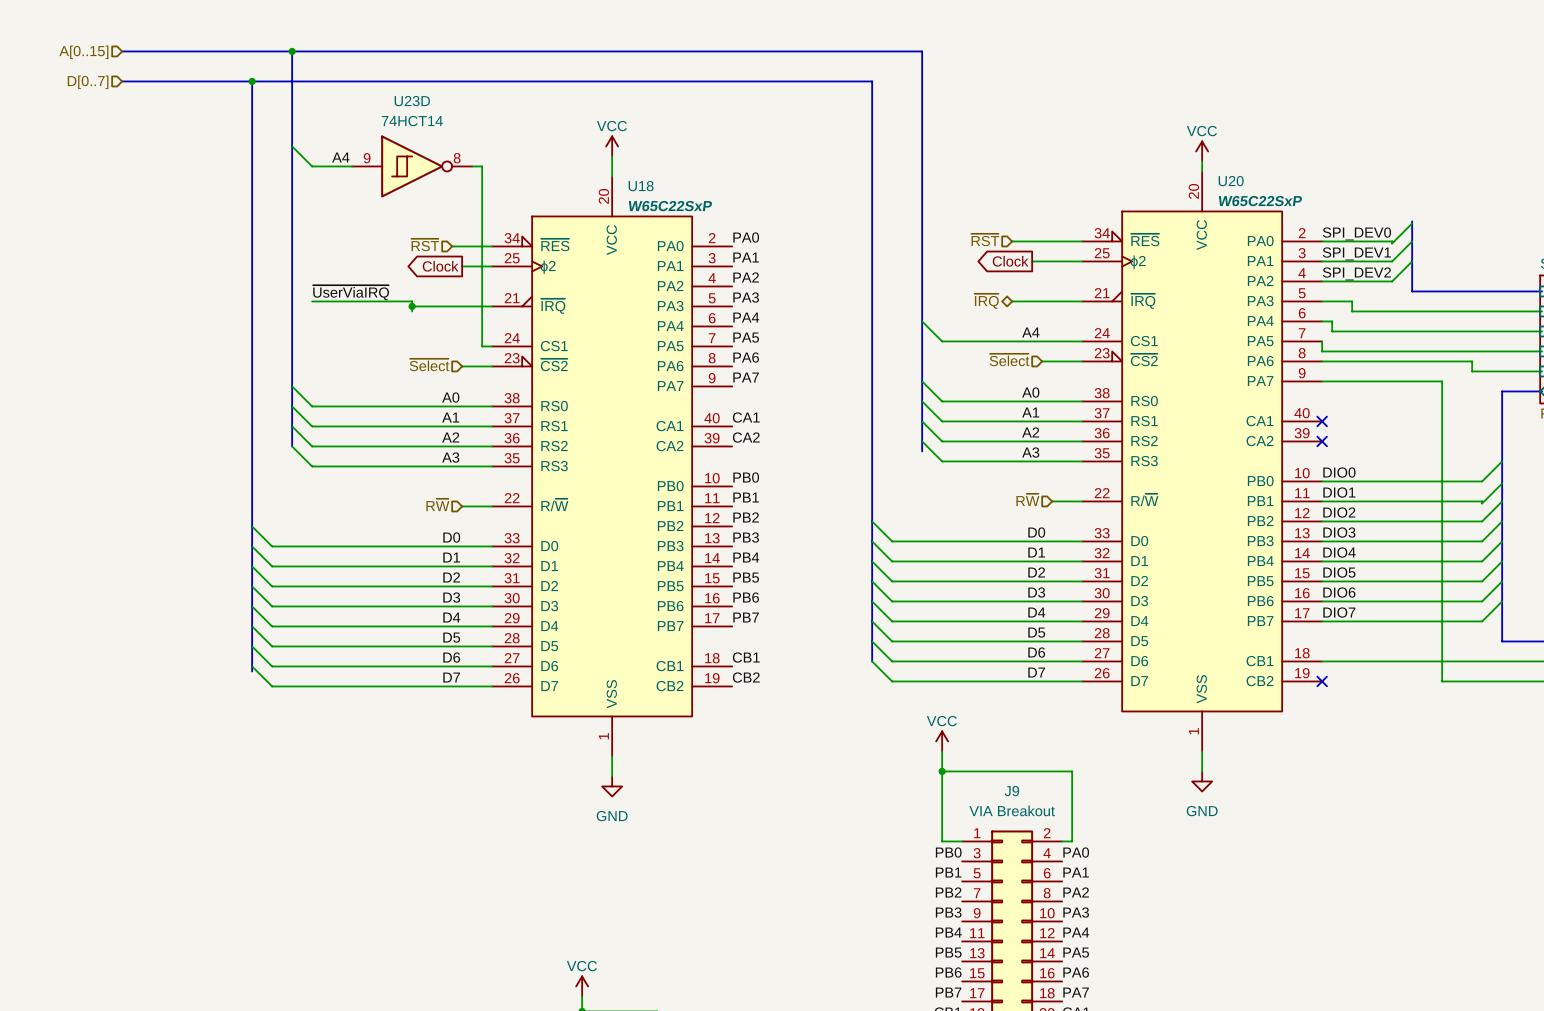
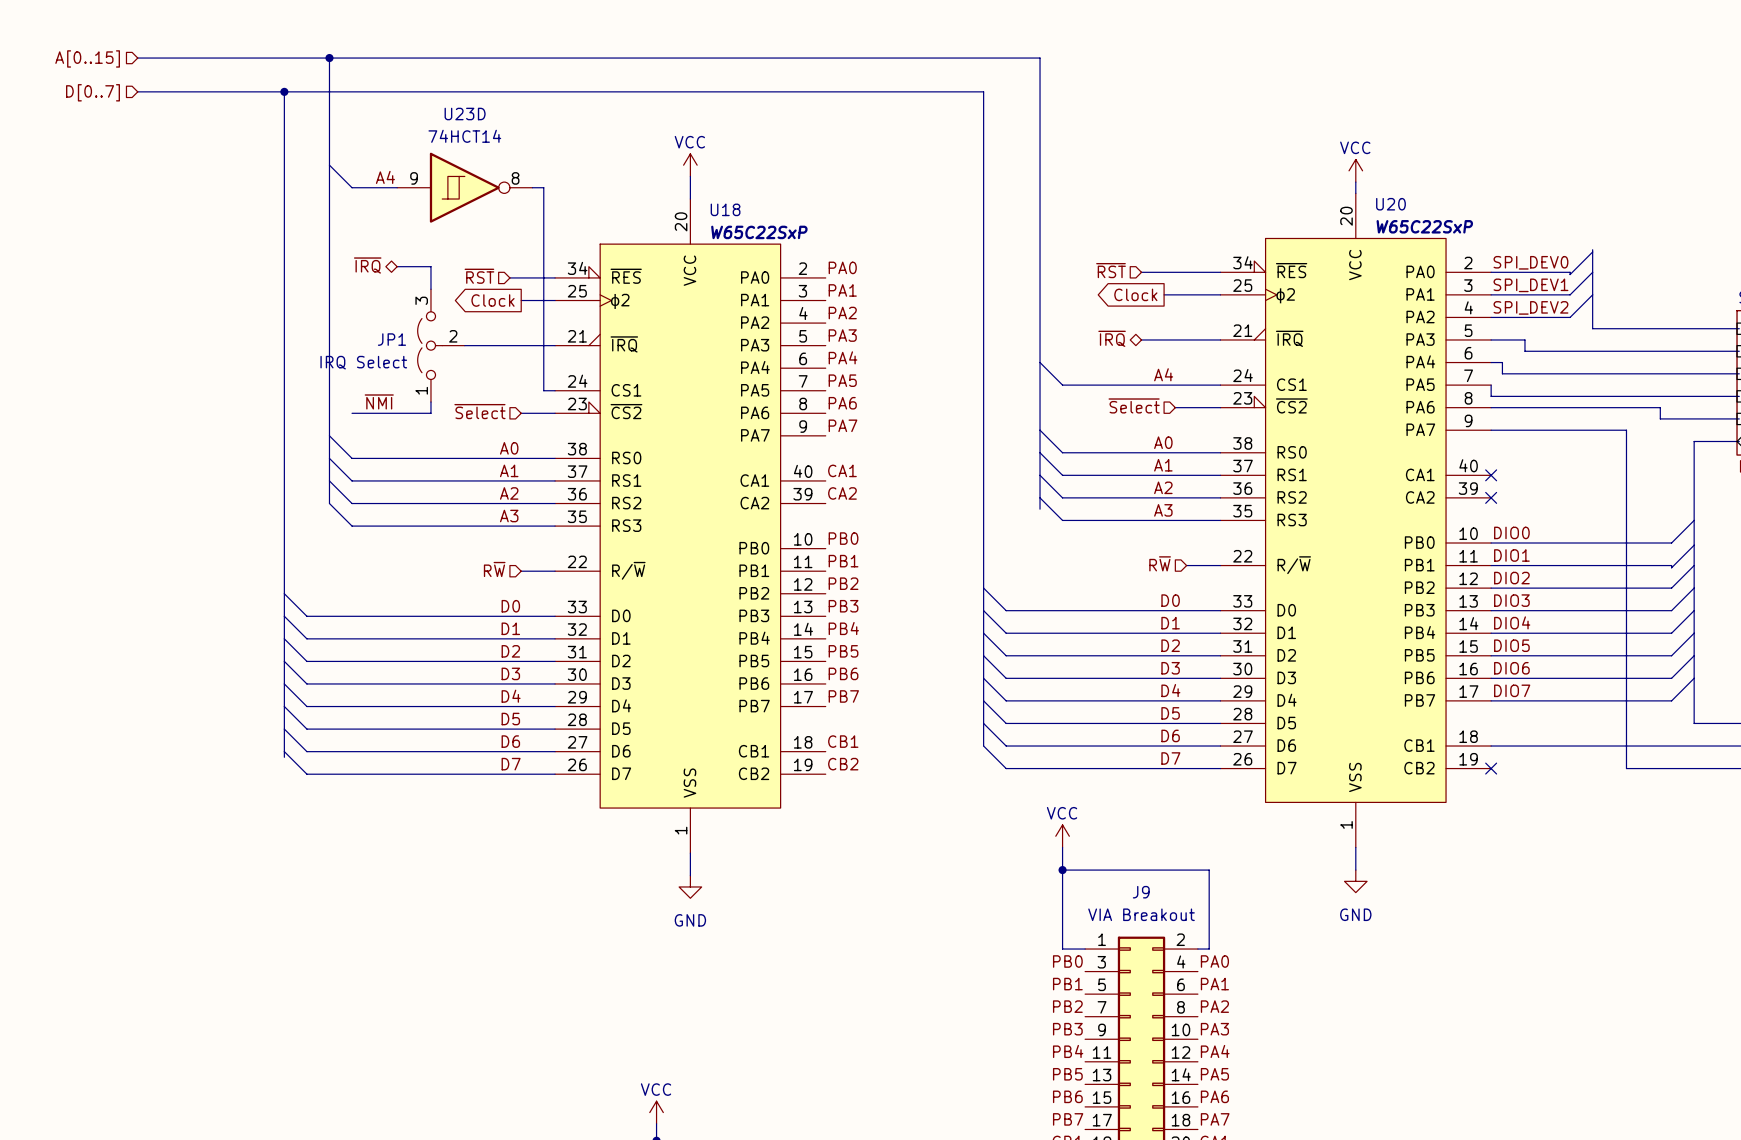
hierarchical label: none -> ~{IRQ} (367, 265)
wire: none -> (397, 266) (430, 266) (430, 289)
label: ~{UserViaIRQ} (351, 292) -> none
wire: (312, 301) (412, 301) (412, 311) -> none
JP1: none -> IRQ Select (441, 345)
junction: (412, 306) -> none
label: none -> ~{NMI} (379, 401)
wire: none -> (430, 402) (430, 413) (352, 413)

